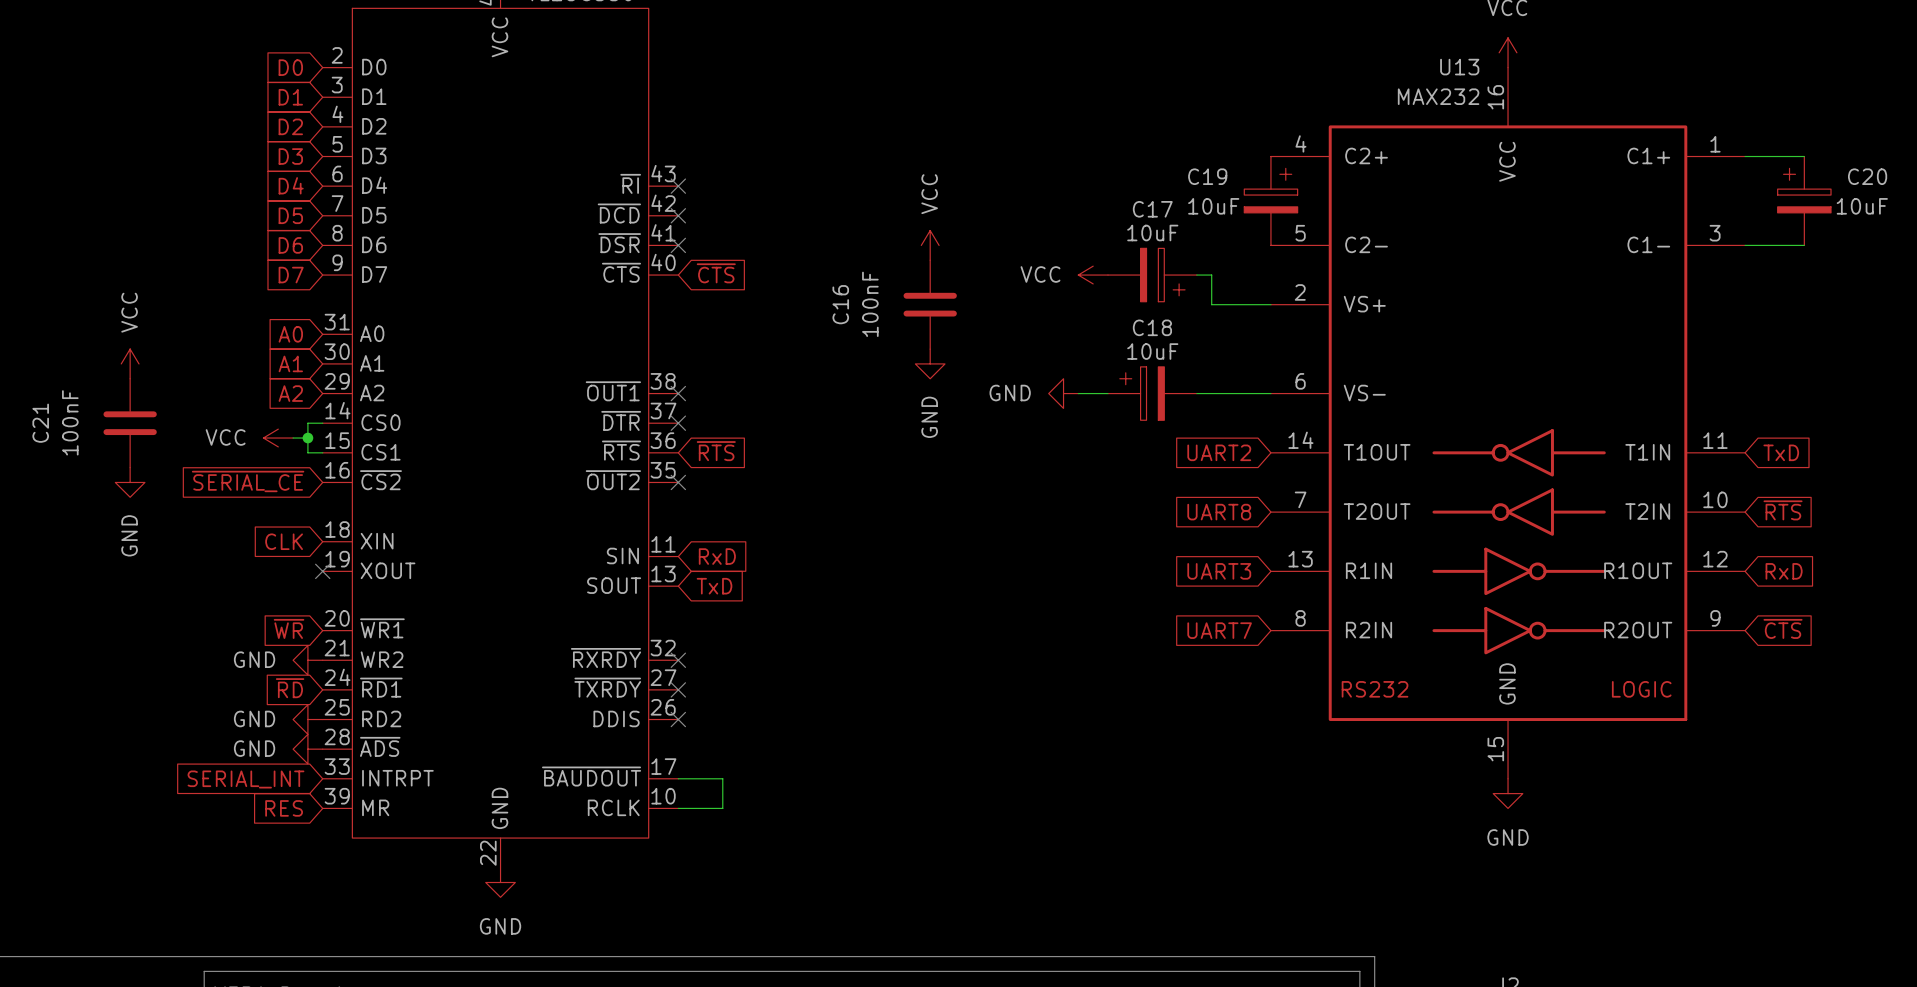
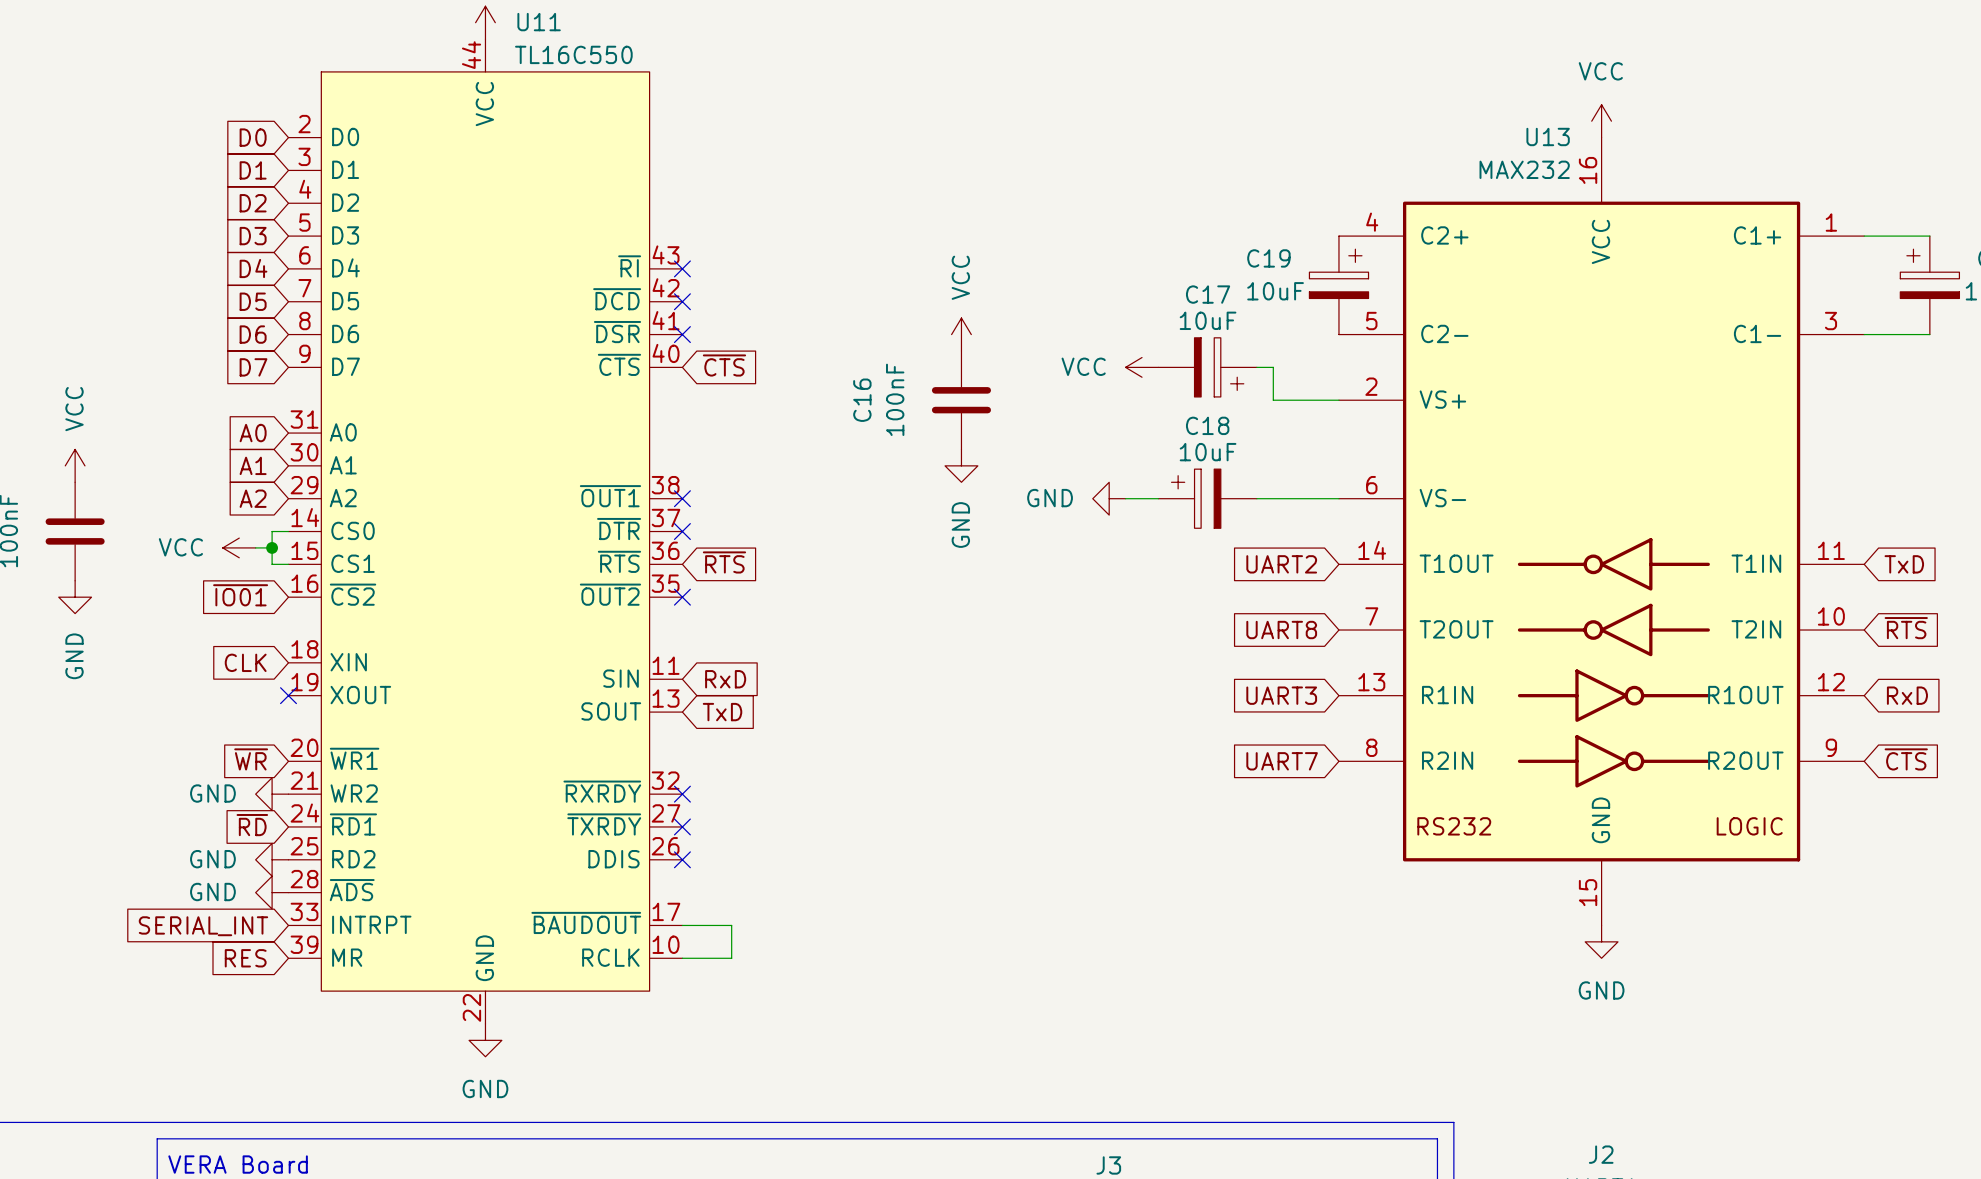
global label: ~{SERIAL_CE} (248, 481) -> ~{IO01} (240, 595)

